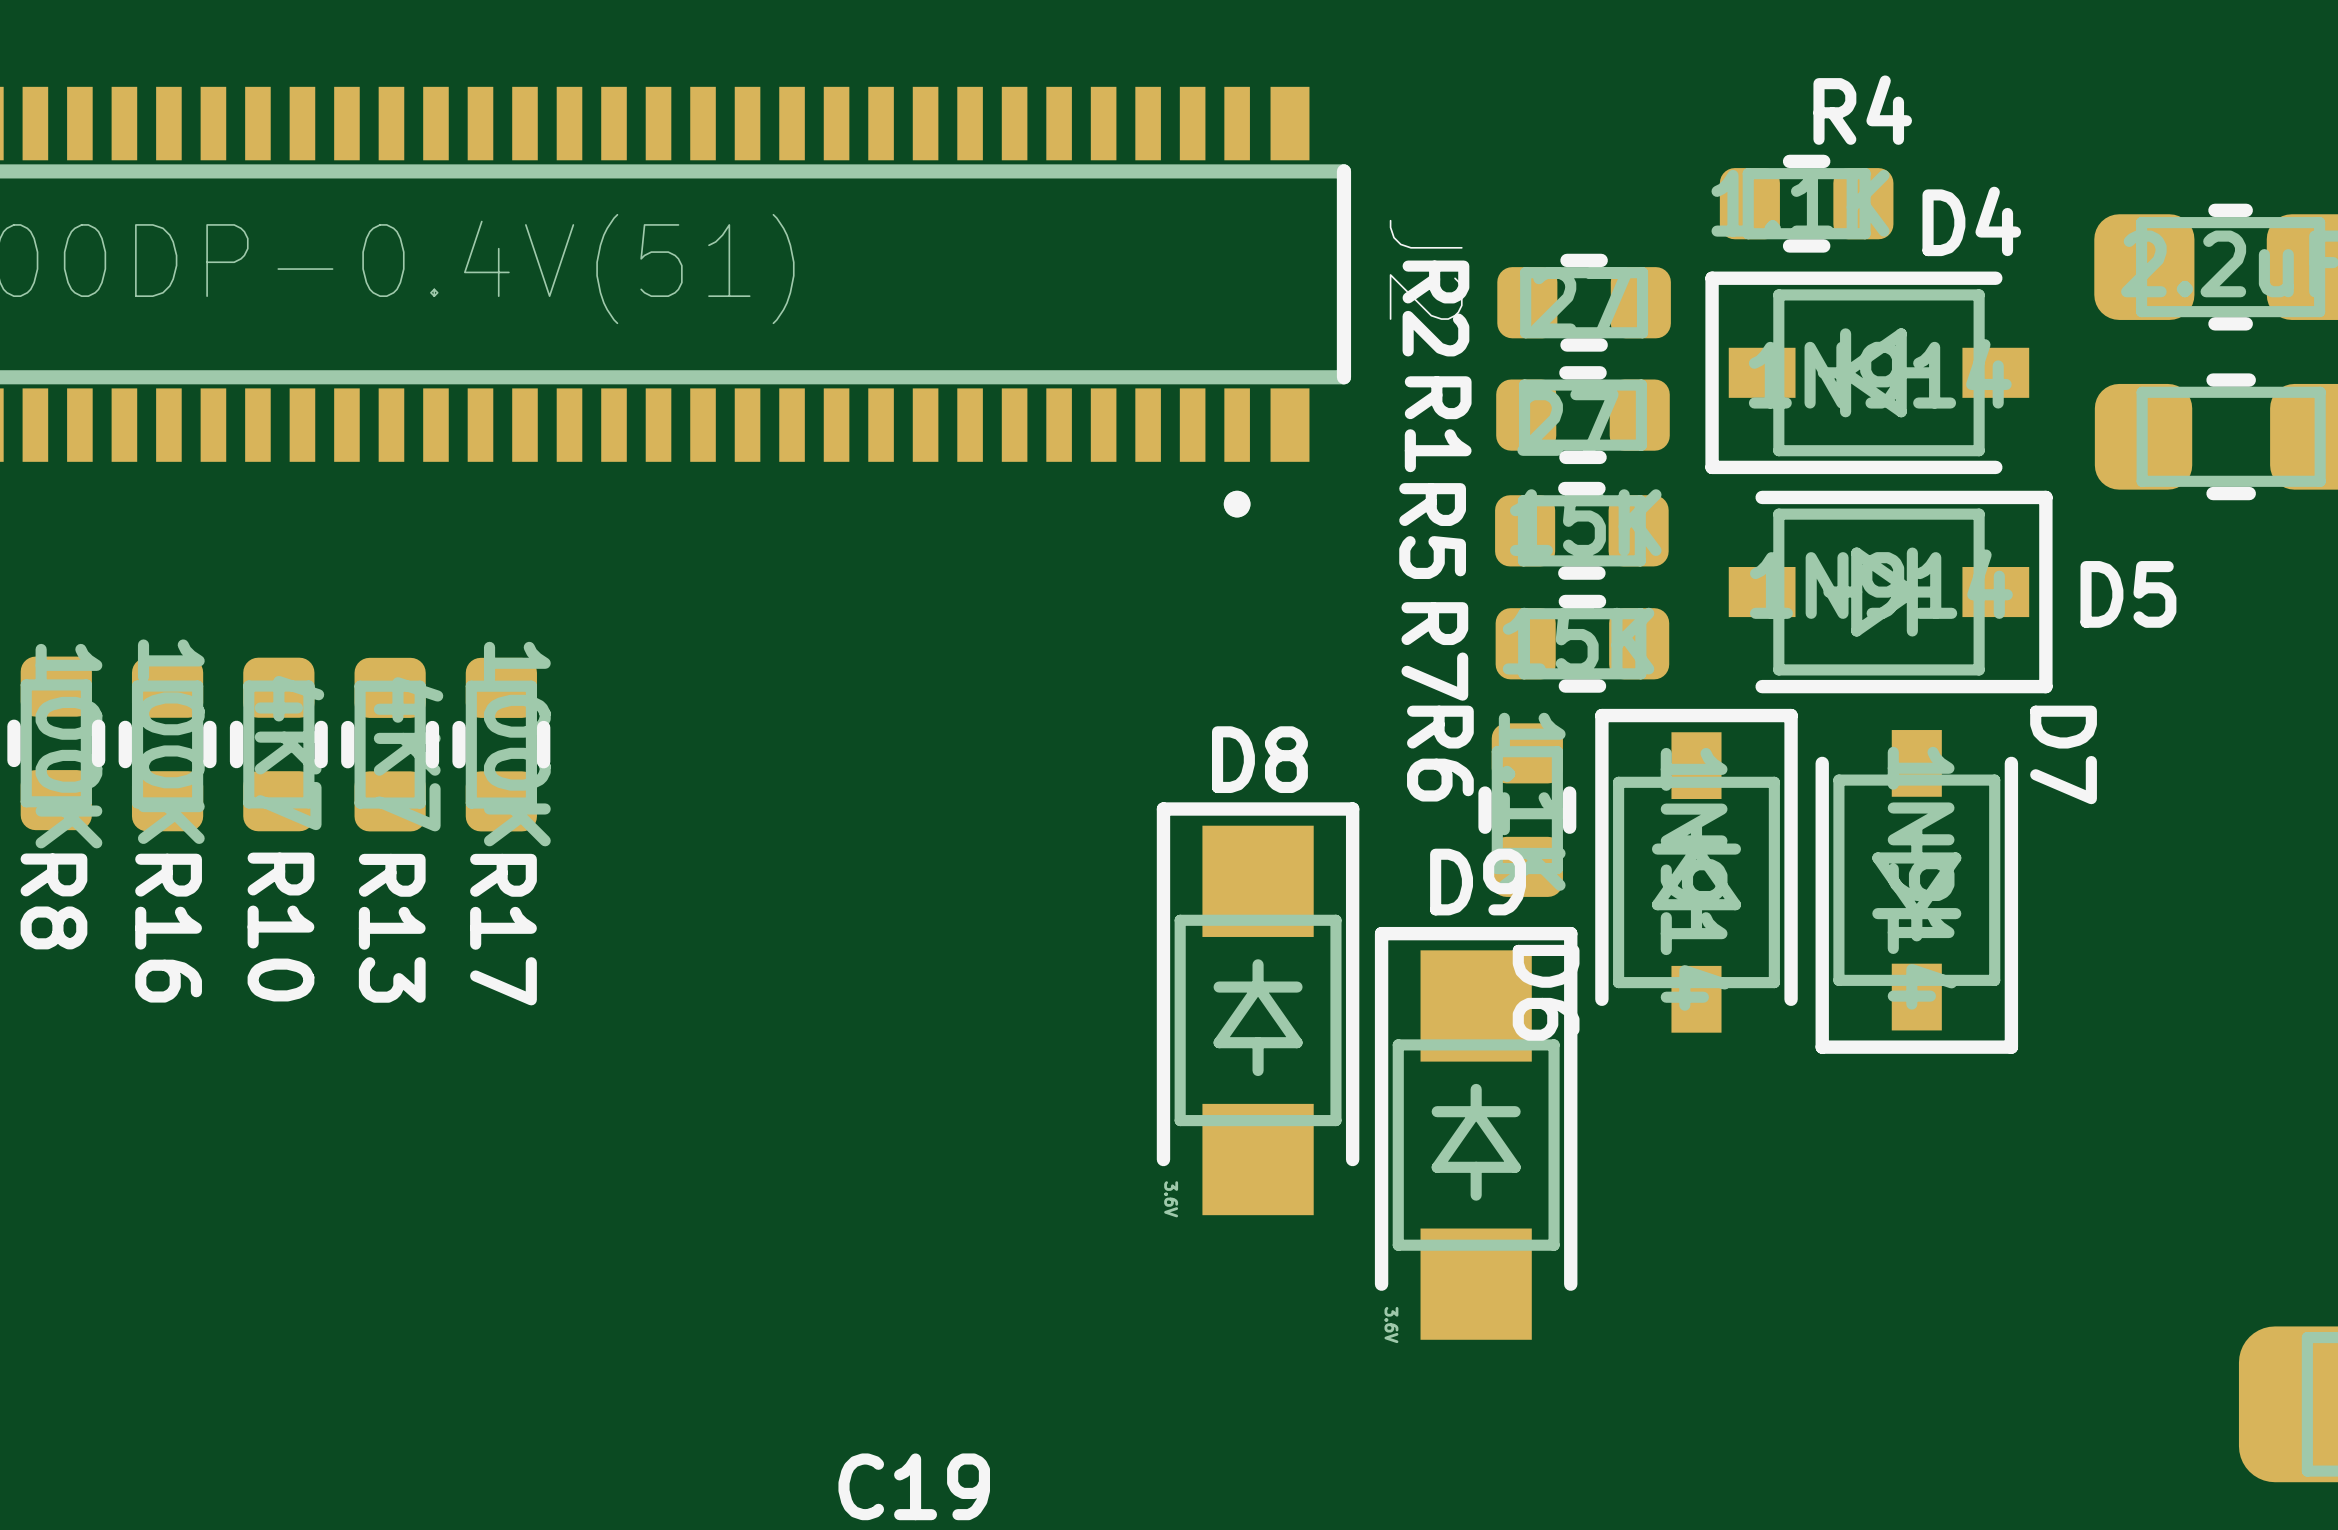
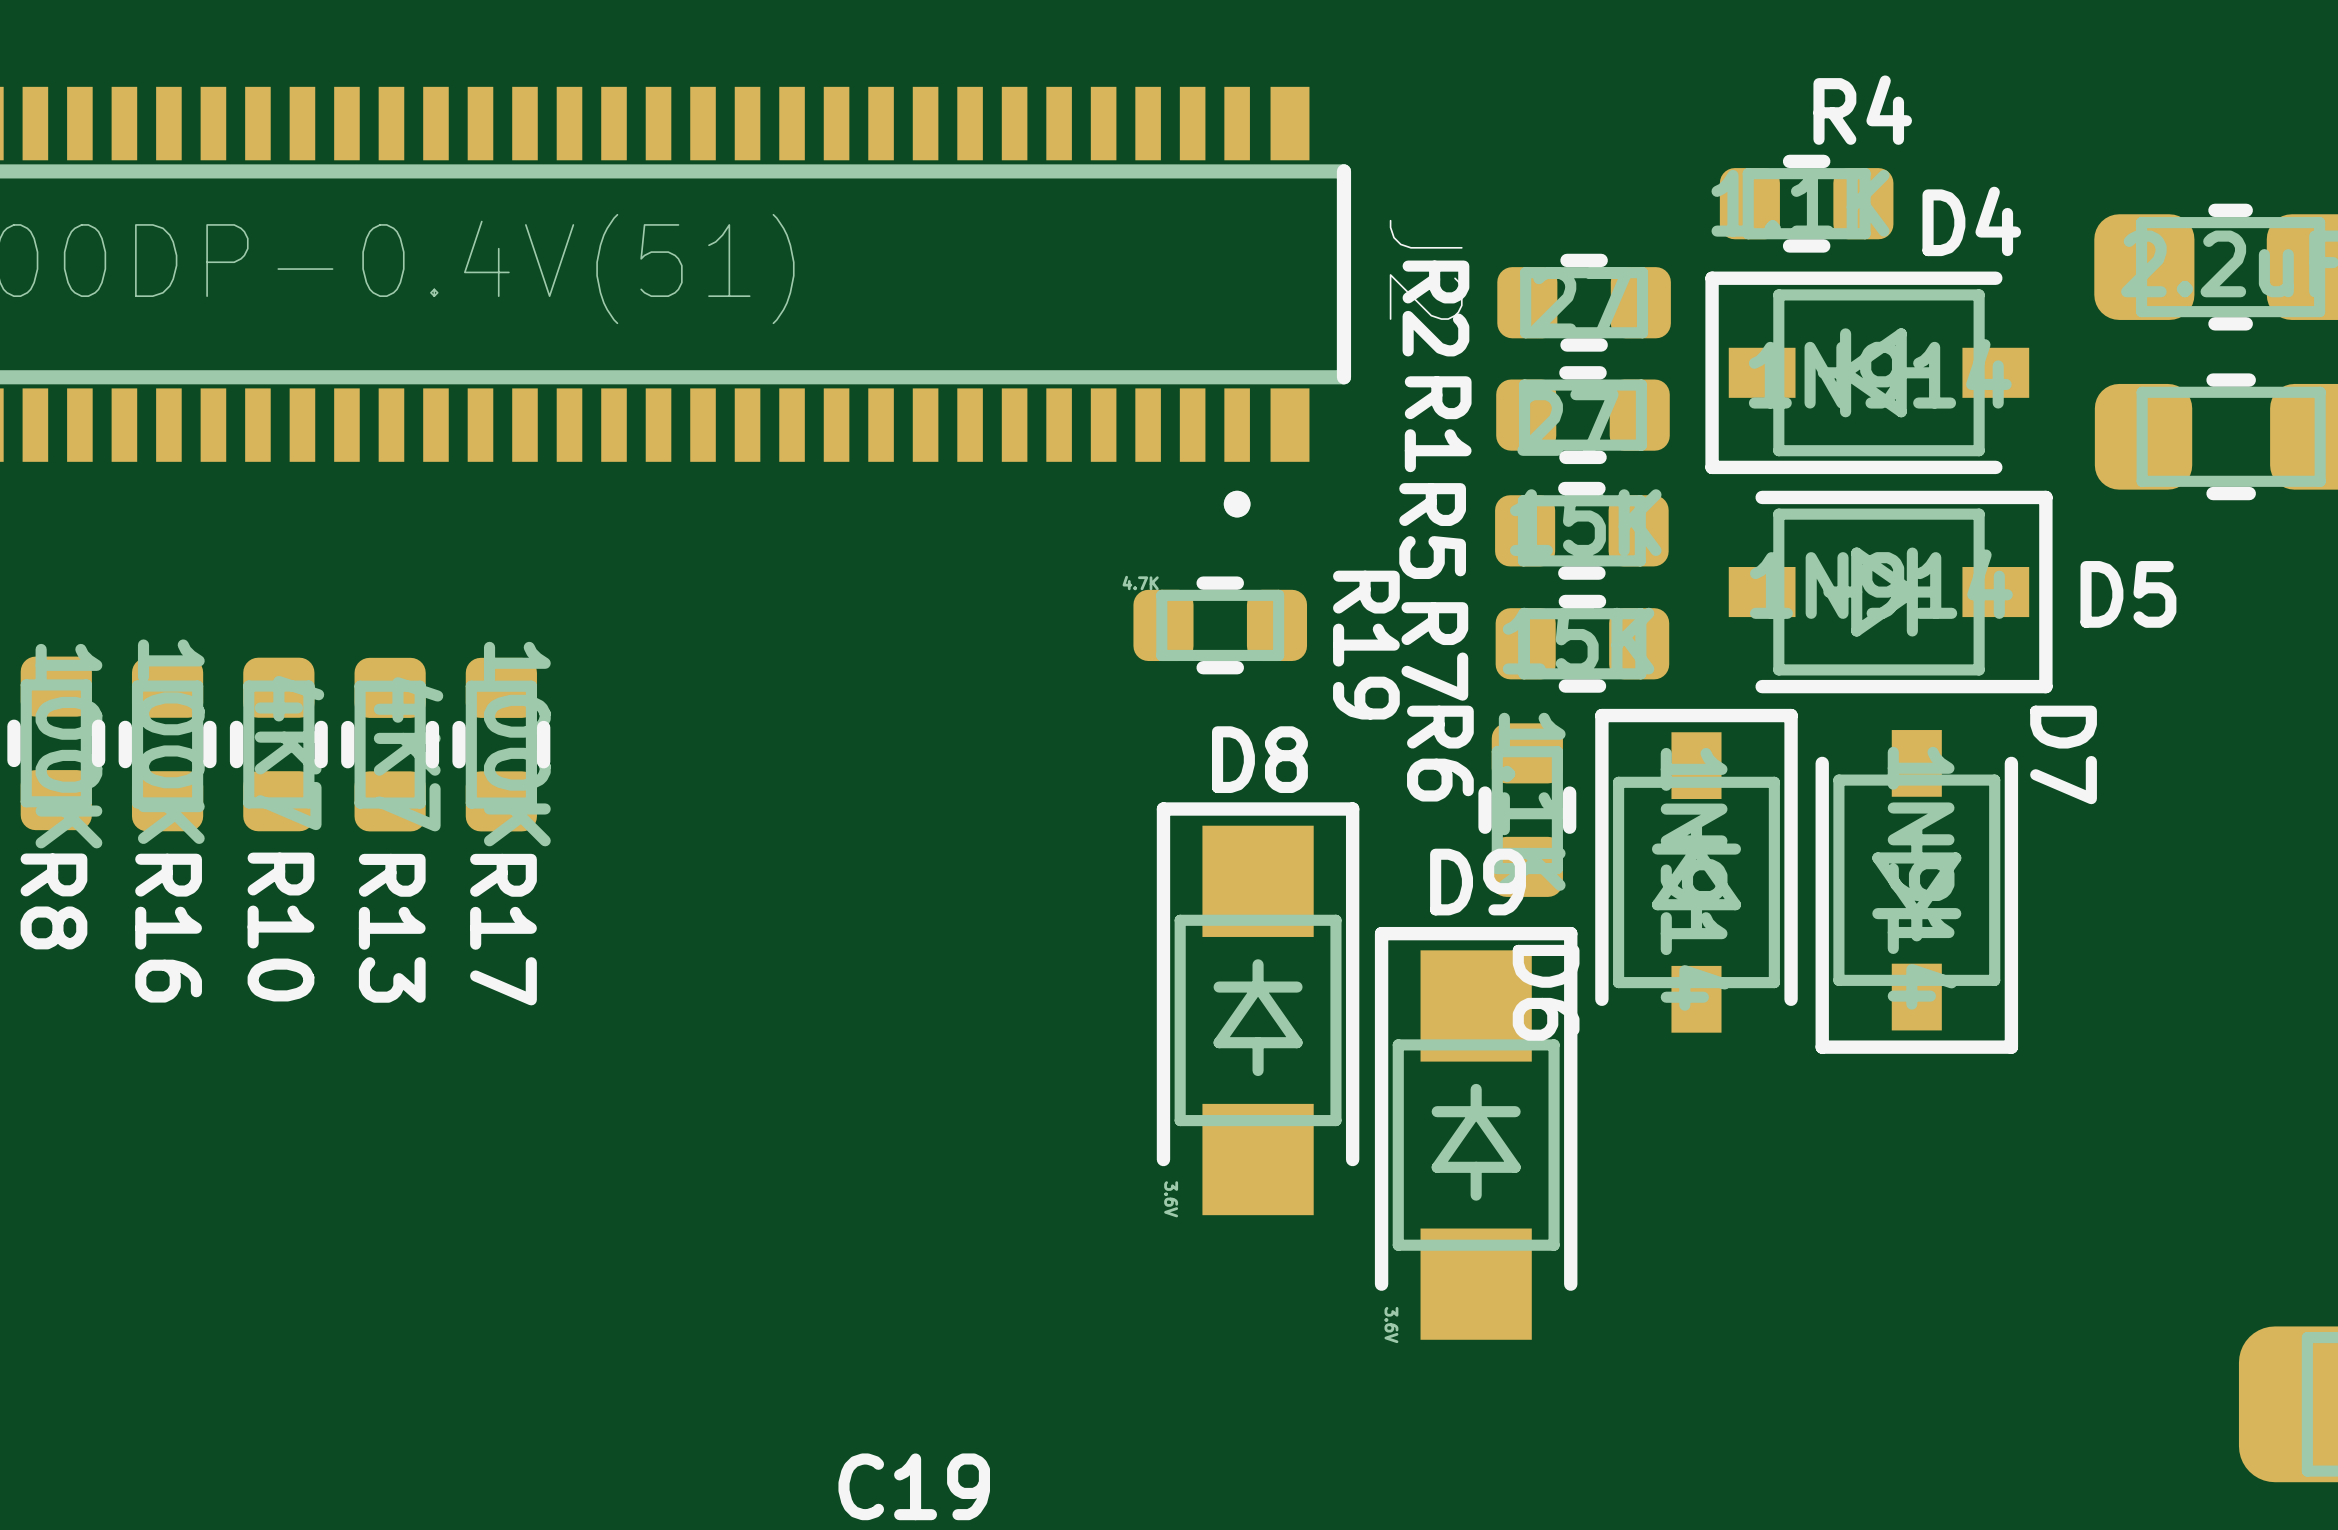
R19: none -> 4.7K (1220, 625)

